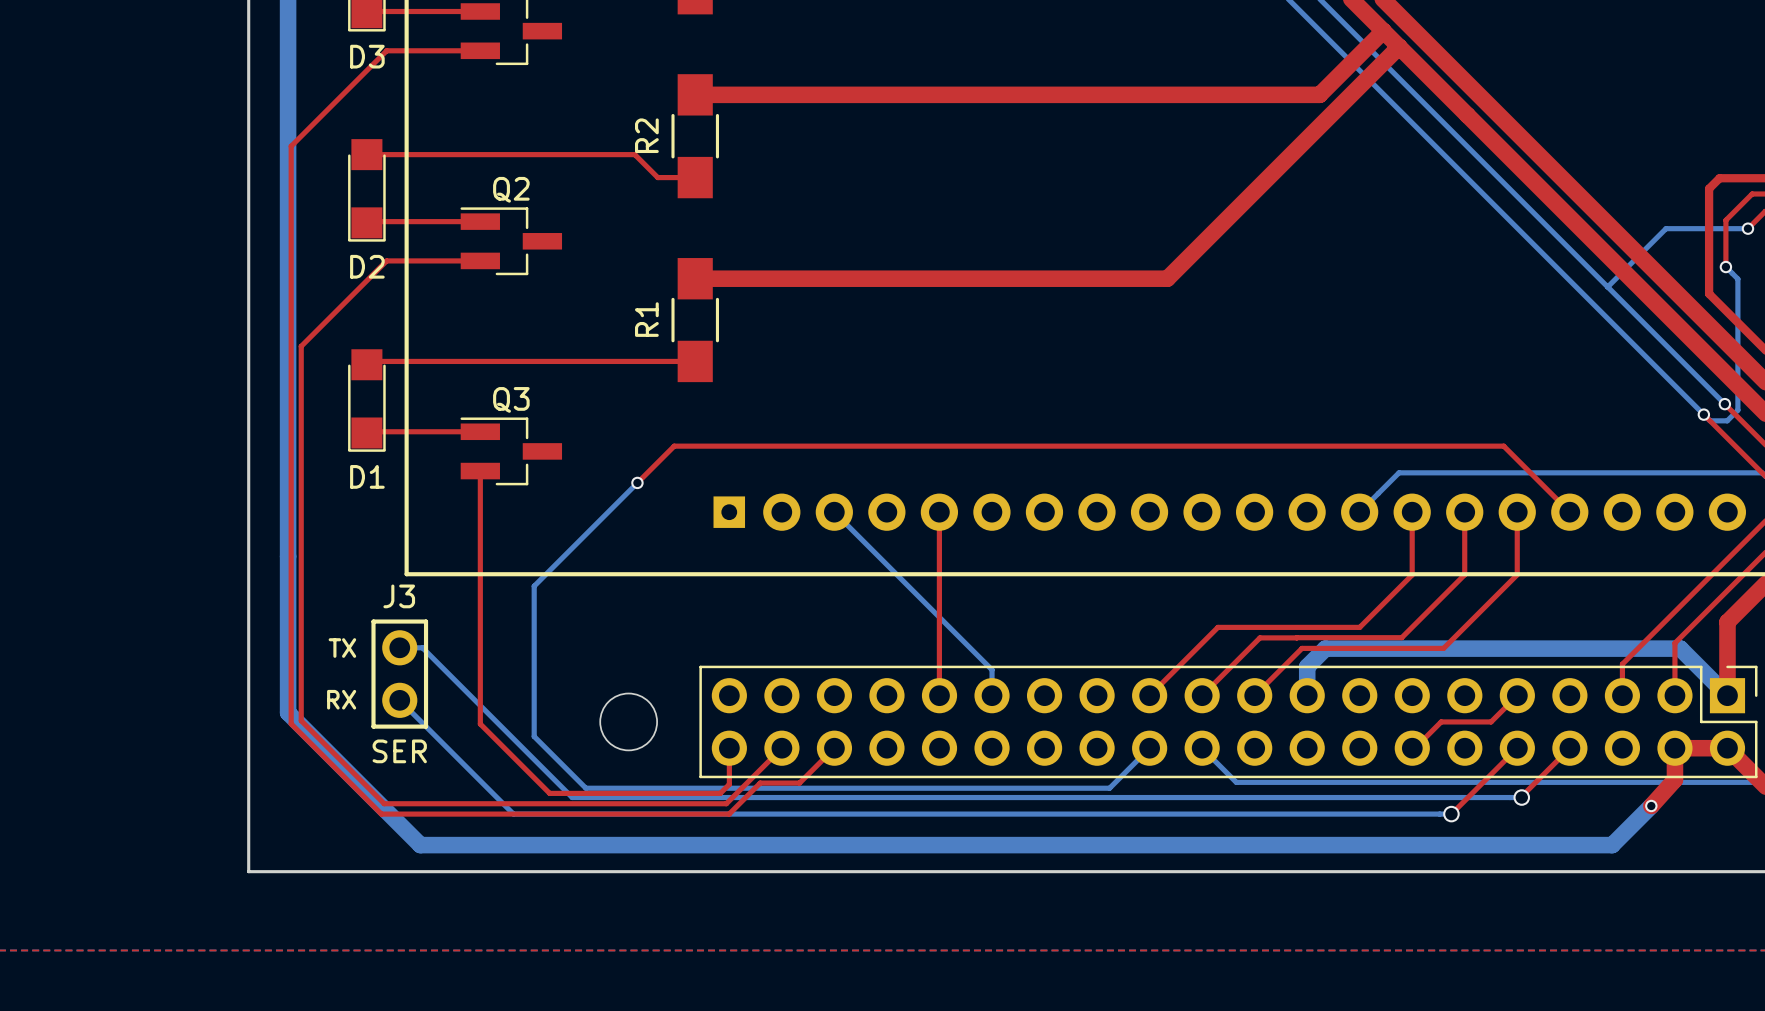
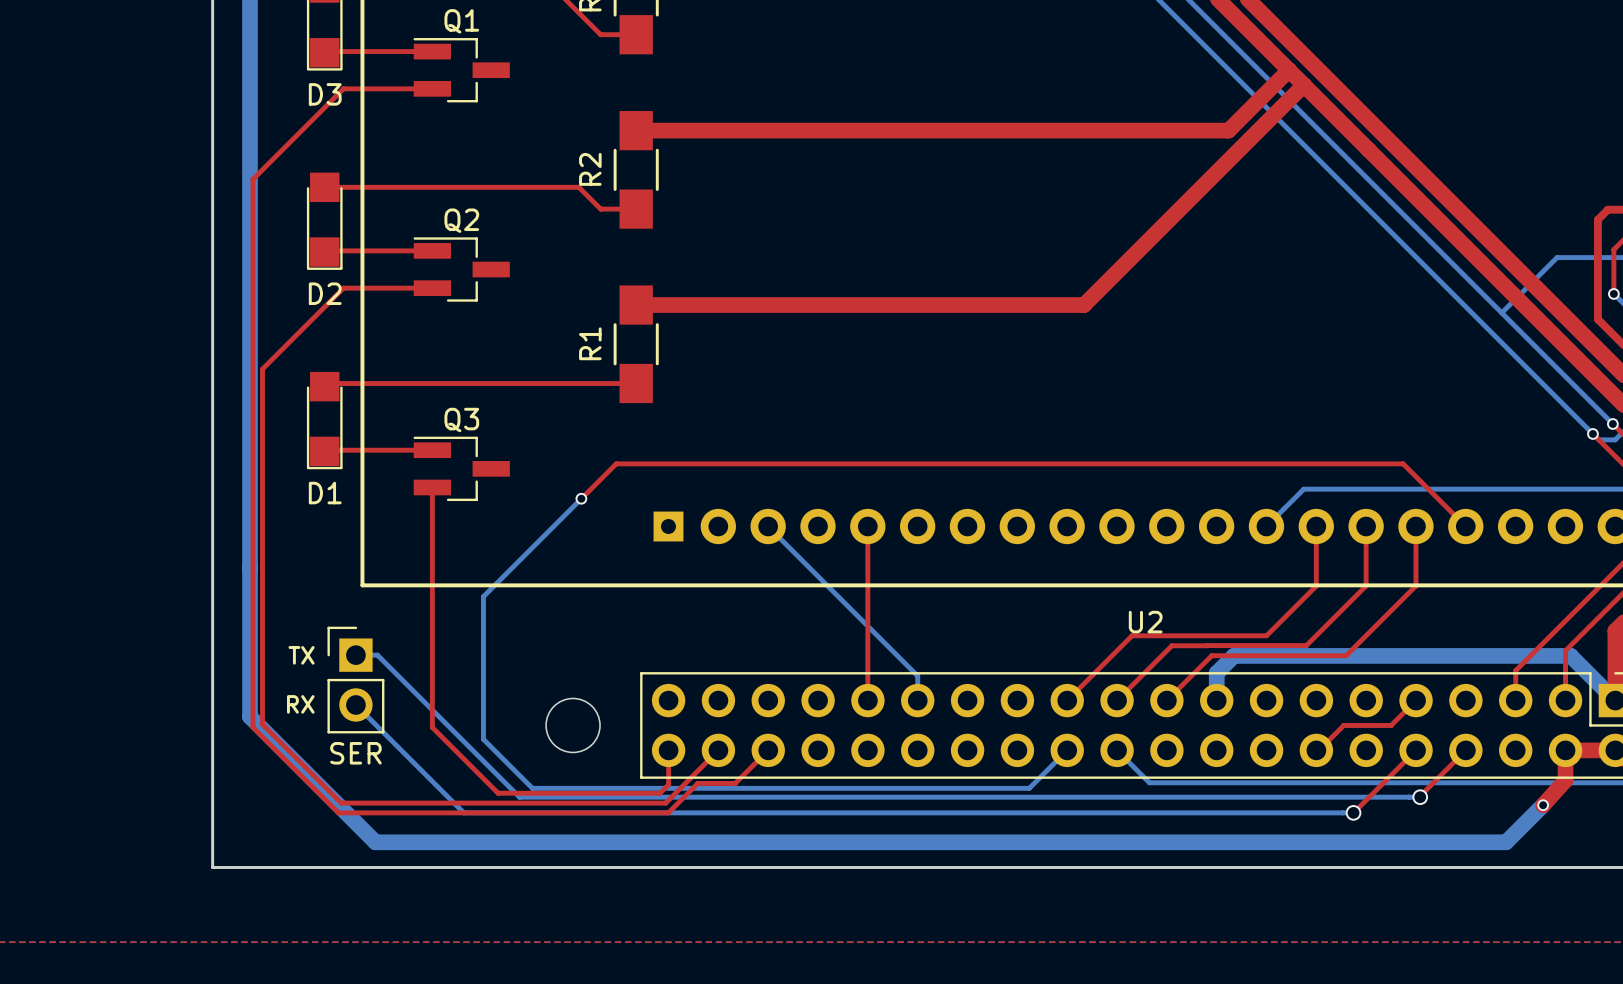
U2 name: none -> U2 (1145, 622)
J3: SER (399, 674) -> none
part: none -> SER (355, 680)

